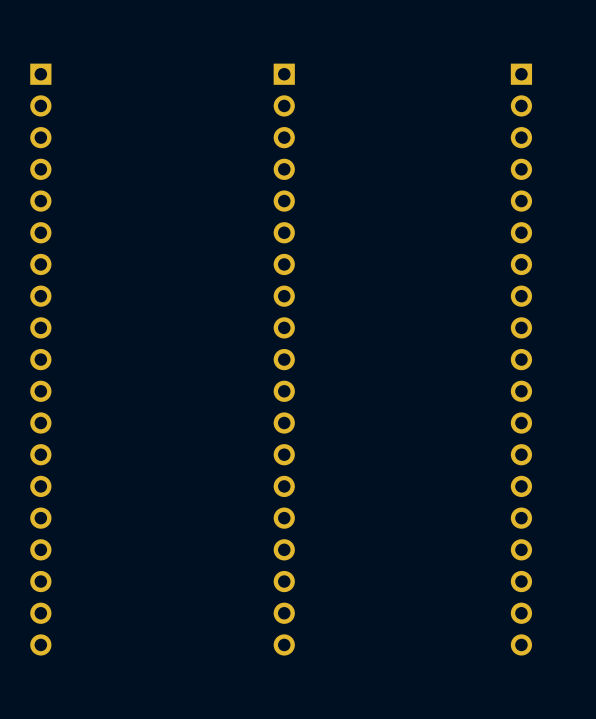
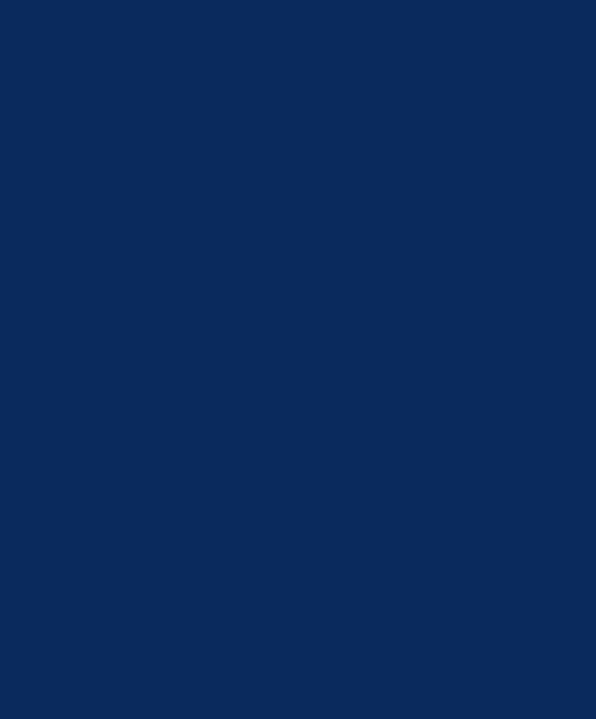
part: (40, 359) -> none
part: (284, 359) -> none
part: (521, 359) -> none

